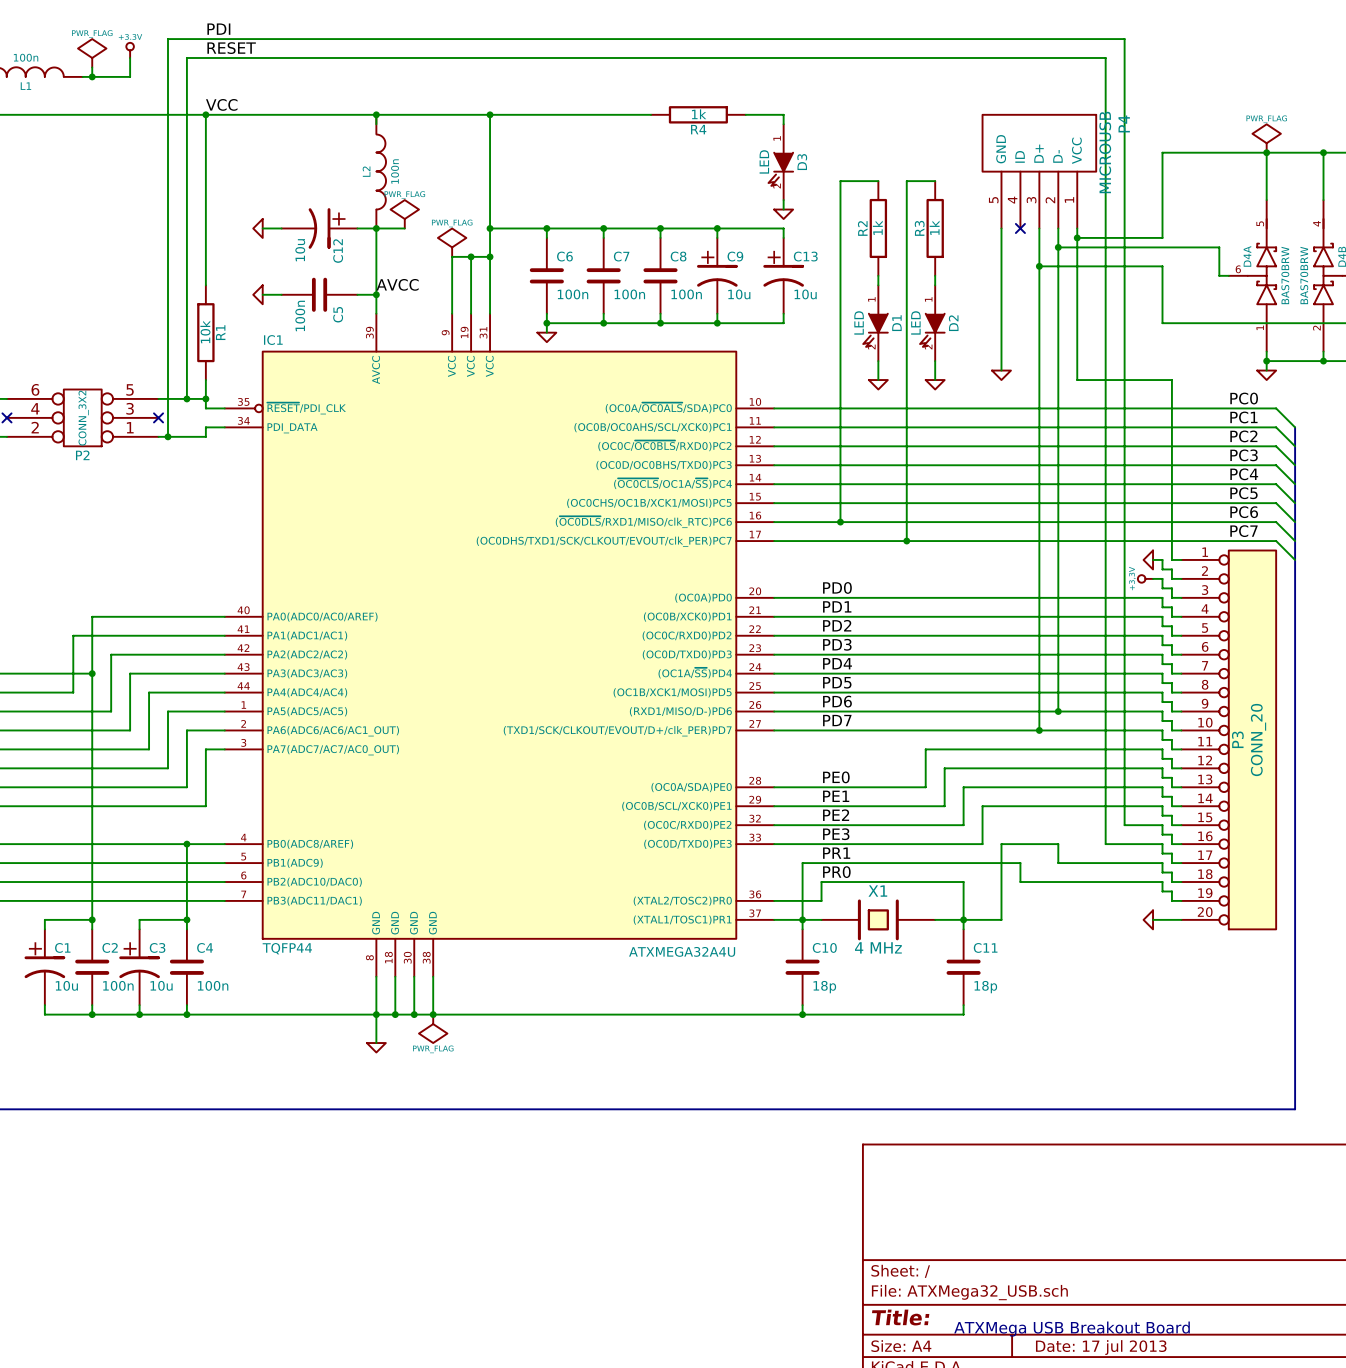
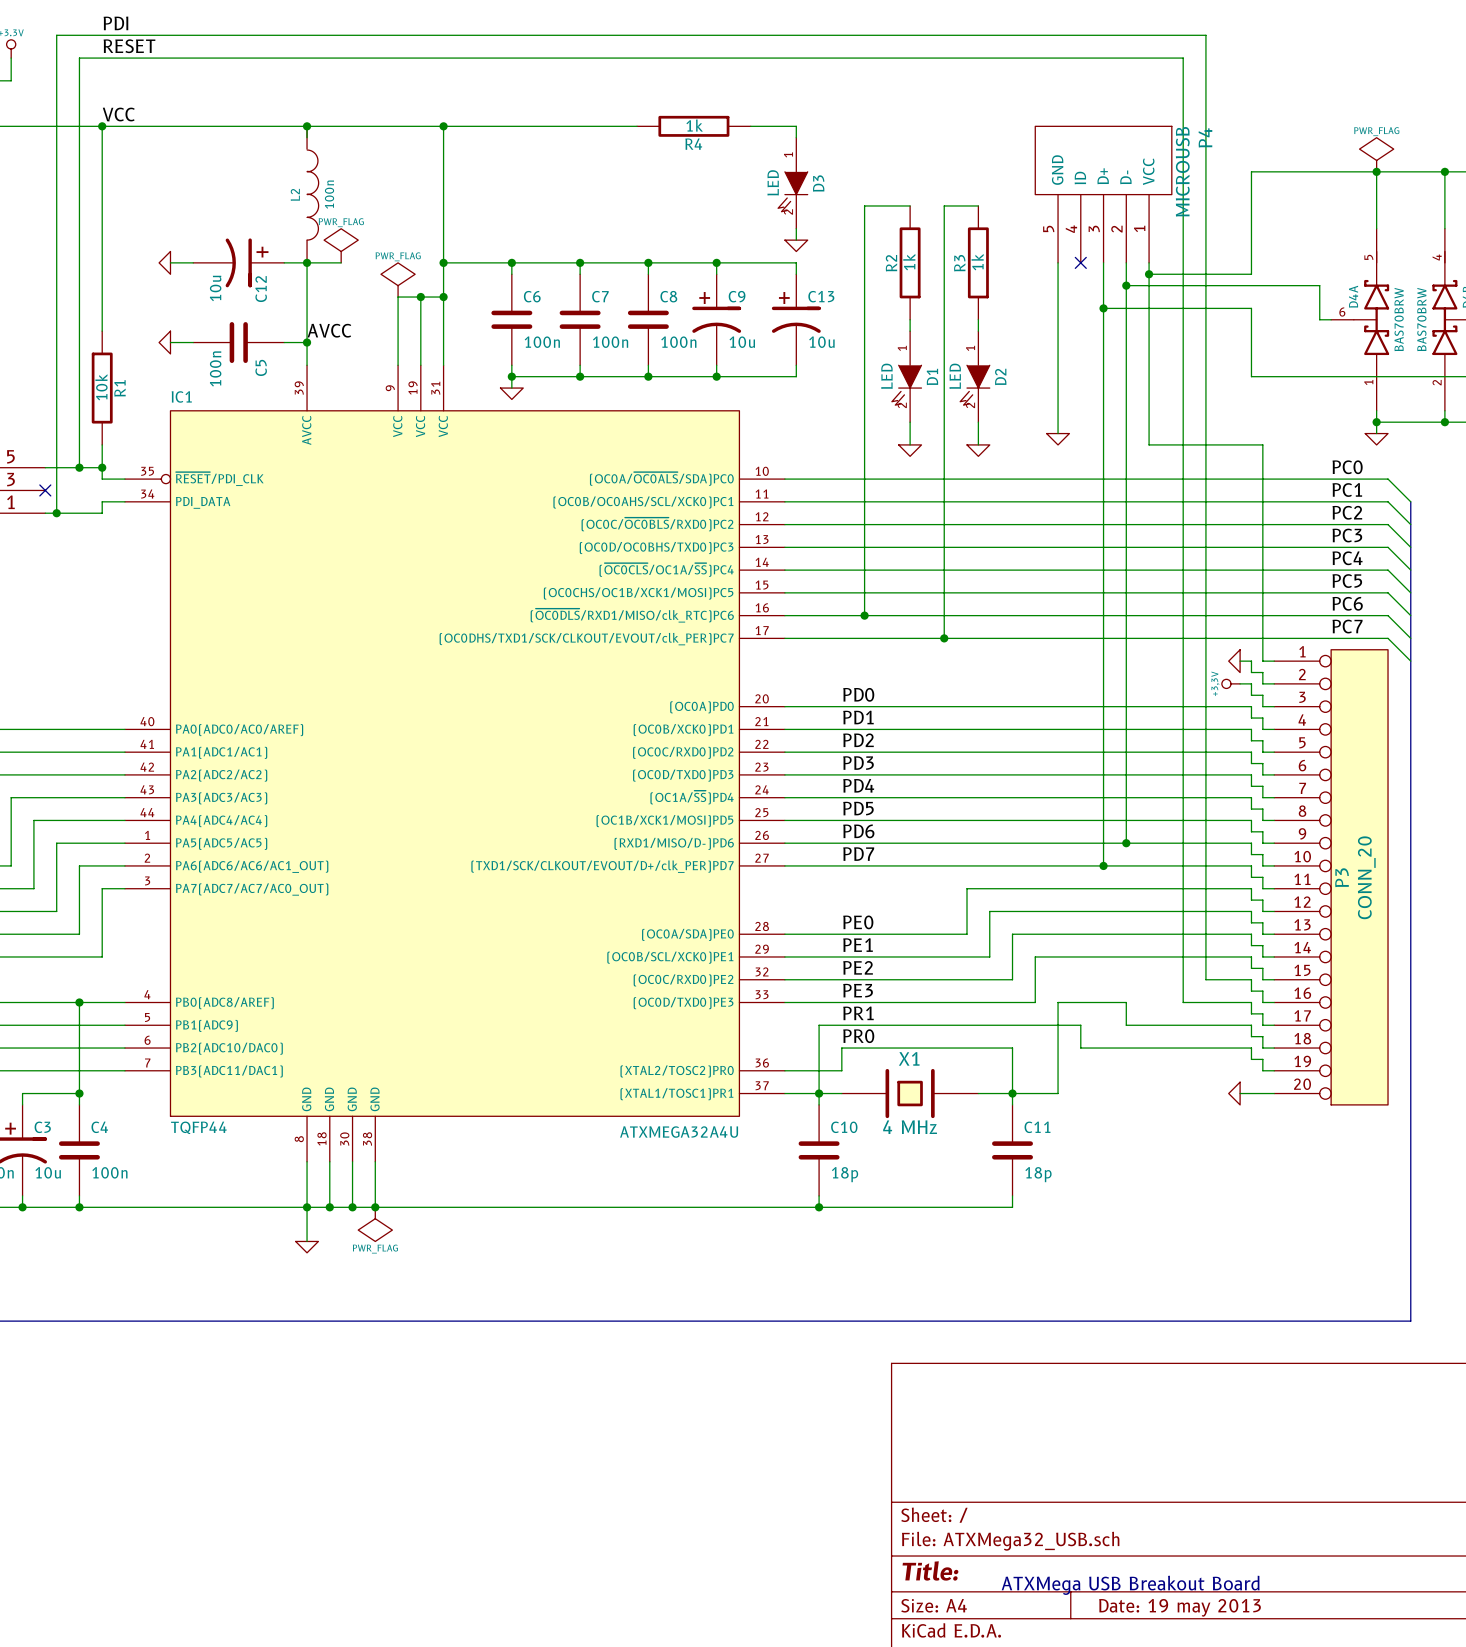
title block: Date: 17 jul 2013 (1101, 1347) -> Date: 19 may 2013 (1180, 1607)

